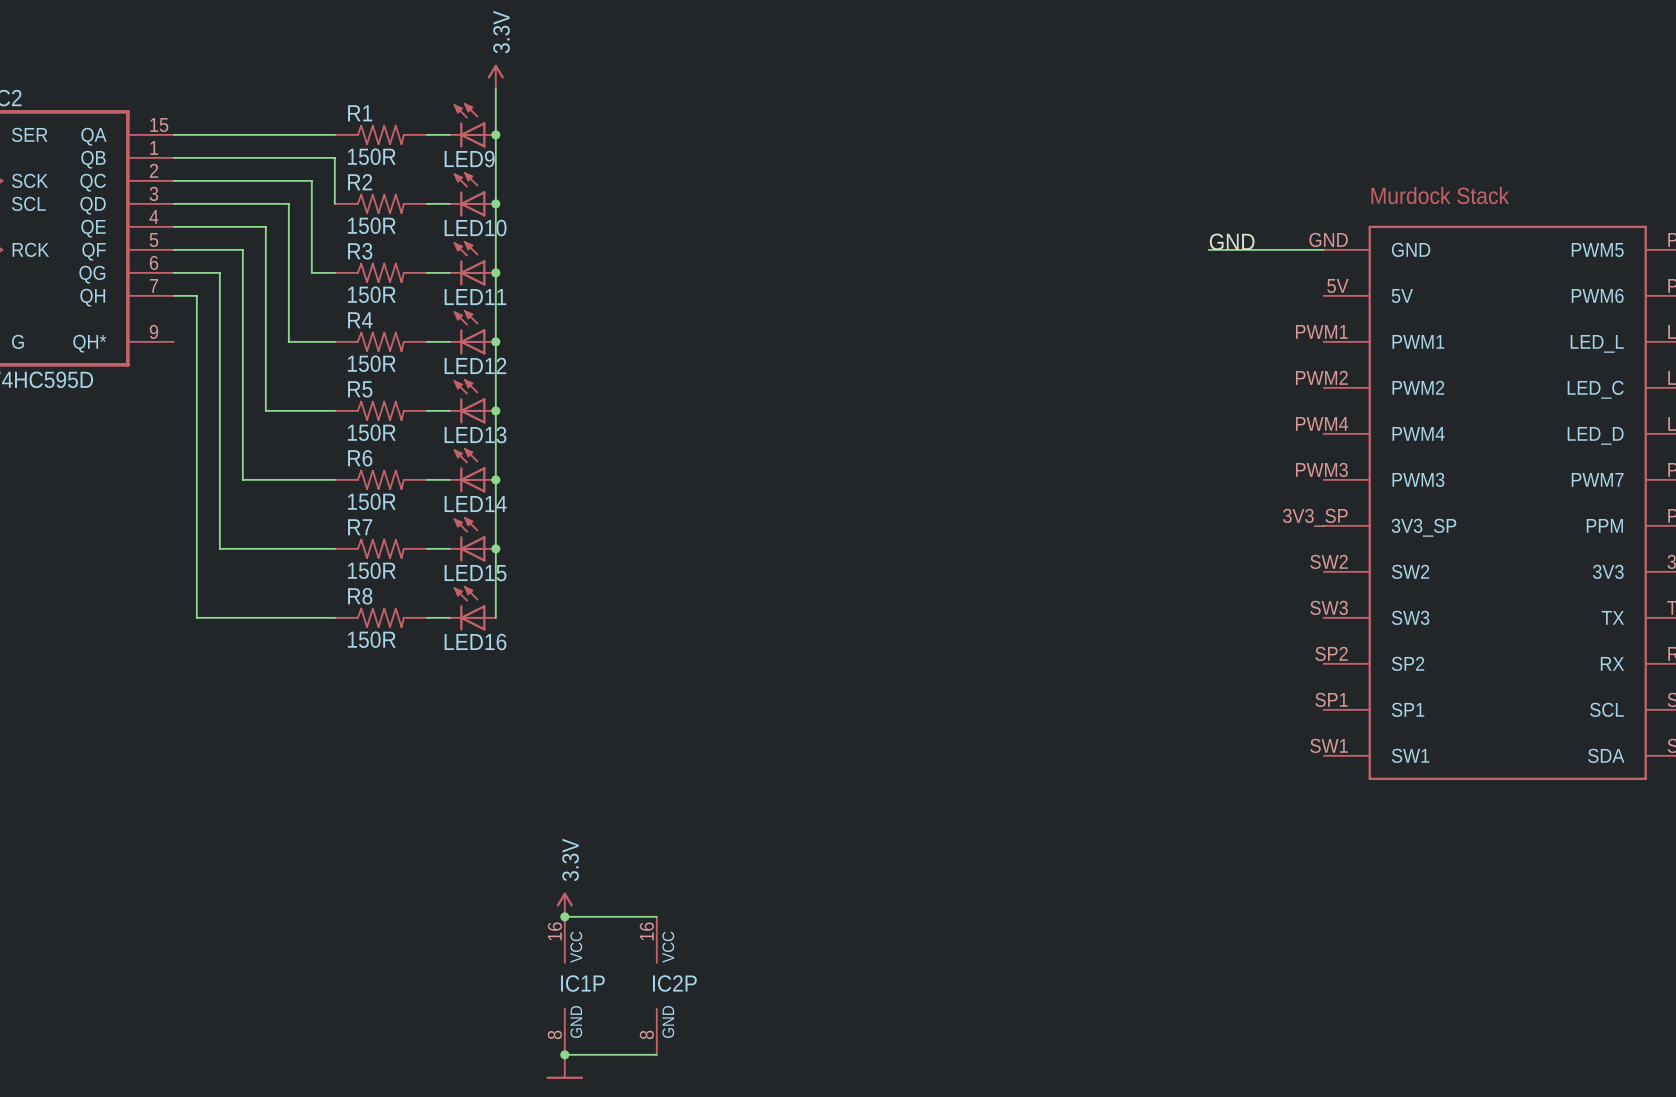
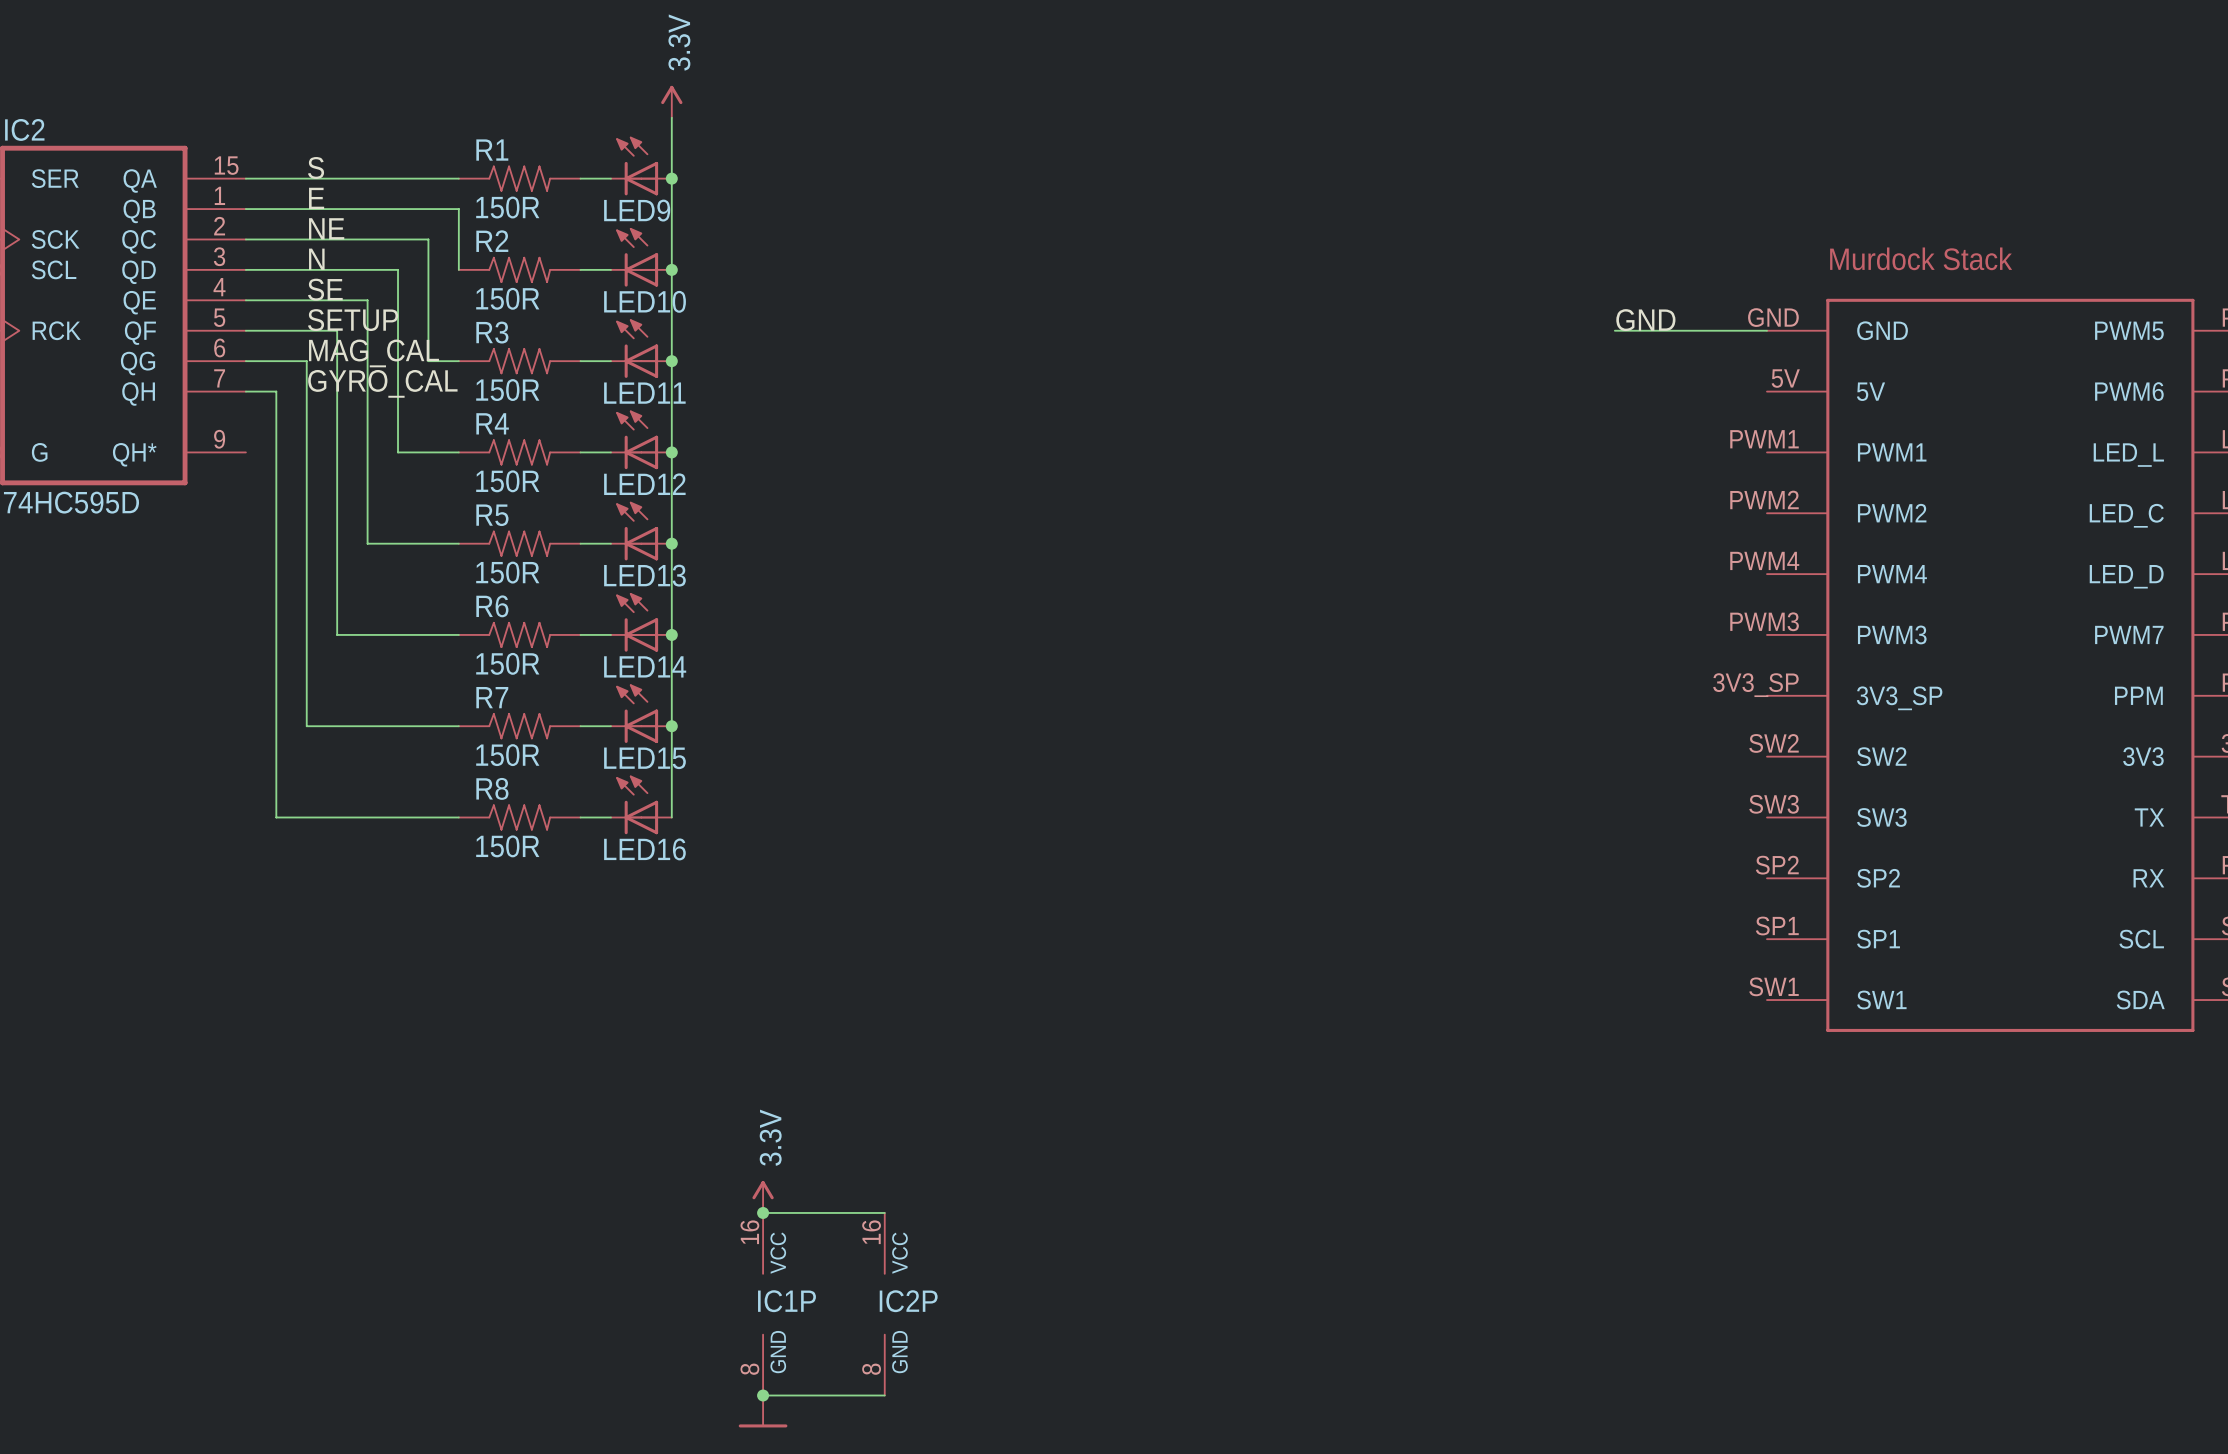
label: none -> S (316, 167)
label: none -> E (316, 198)
label: none -> NE (326, 228)
label: none -> N (316, 259)
label: none -> SE (325, 289)
label: none -> SETUP (353, 320)
label: none -> MAG_CAL (373, 353)
label: none -> GYRO_CAL (382, 383)

